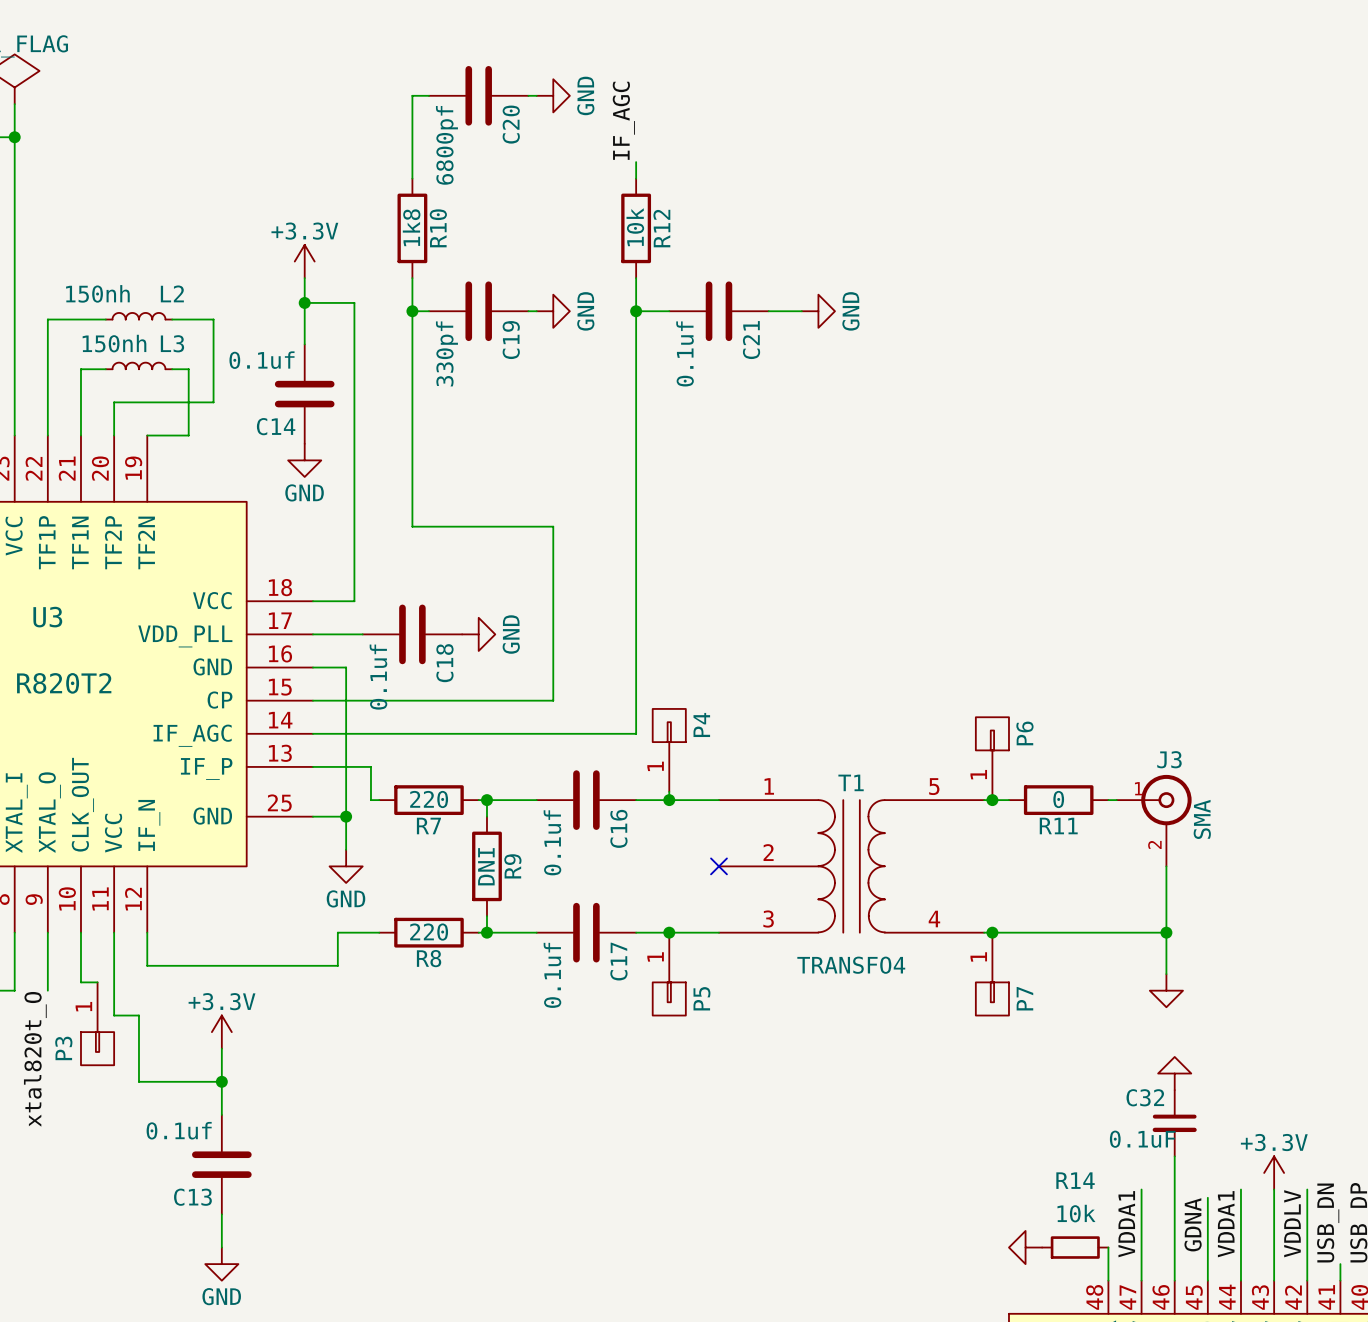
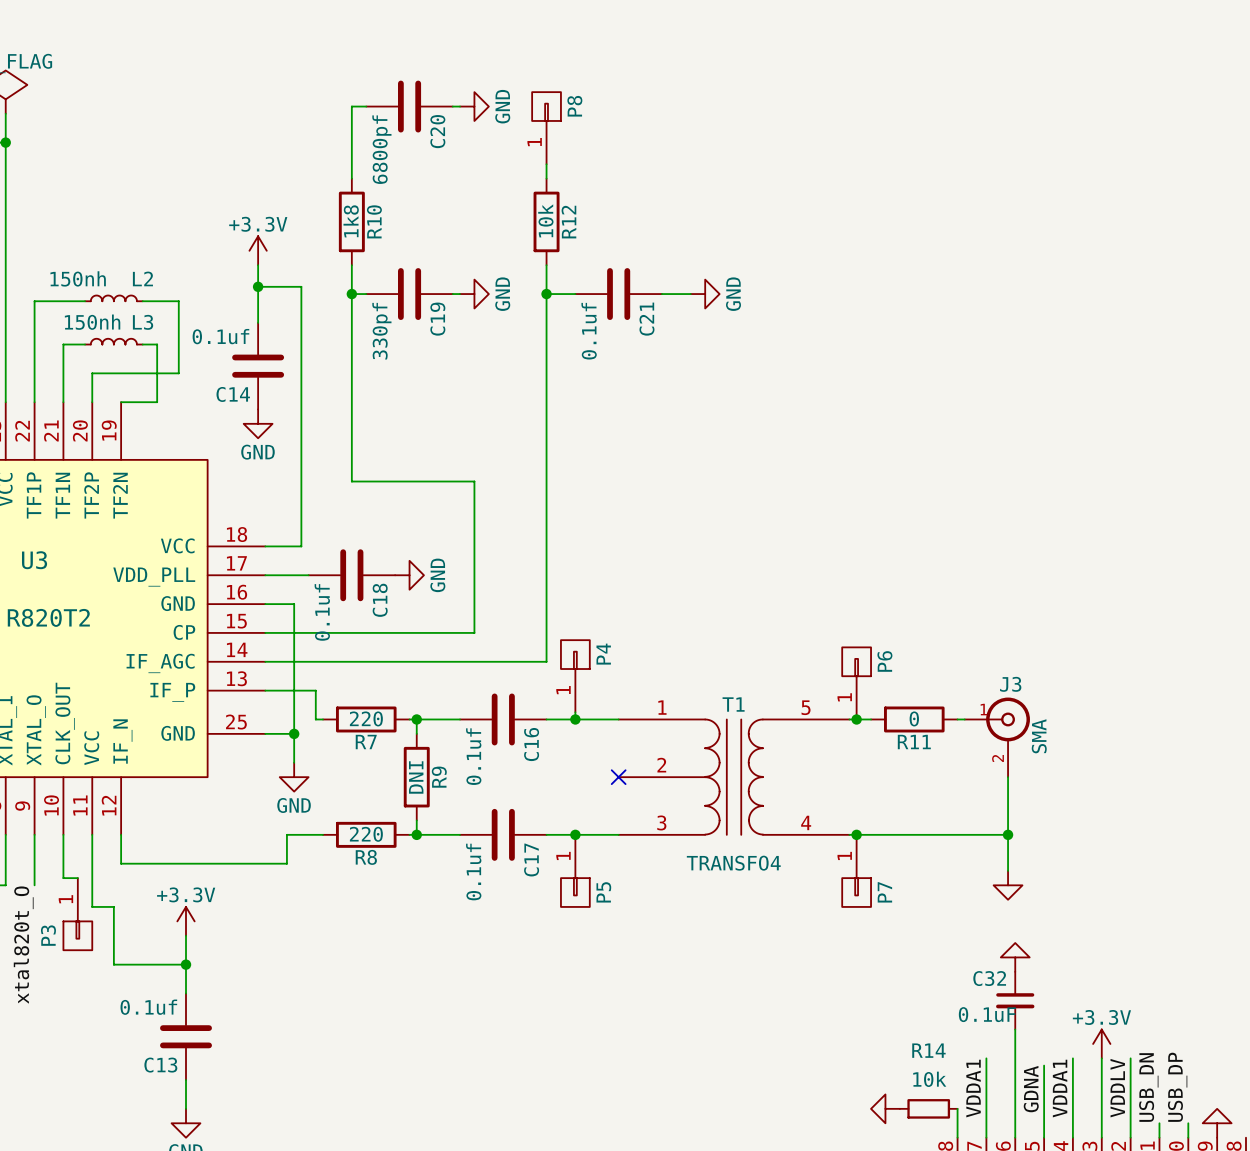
label: IF_AGC (623, 120) -> none
P8: none -> (546, 128)

